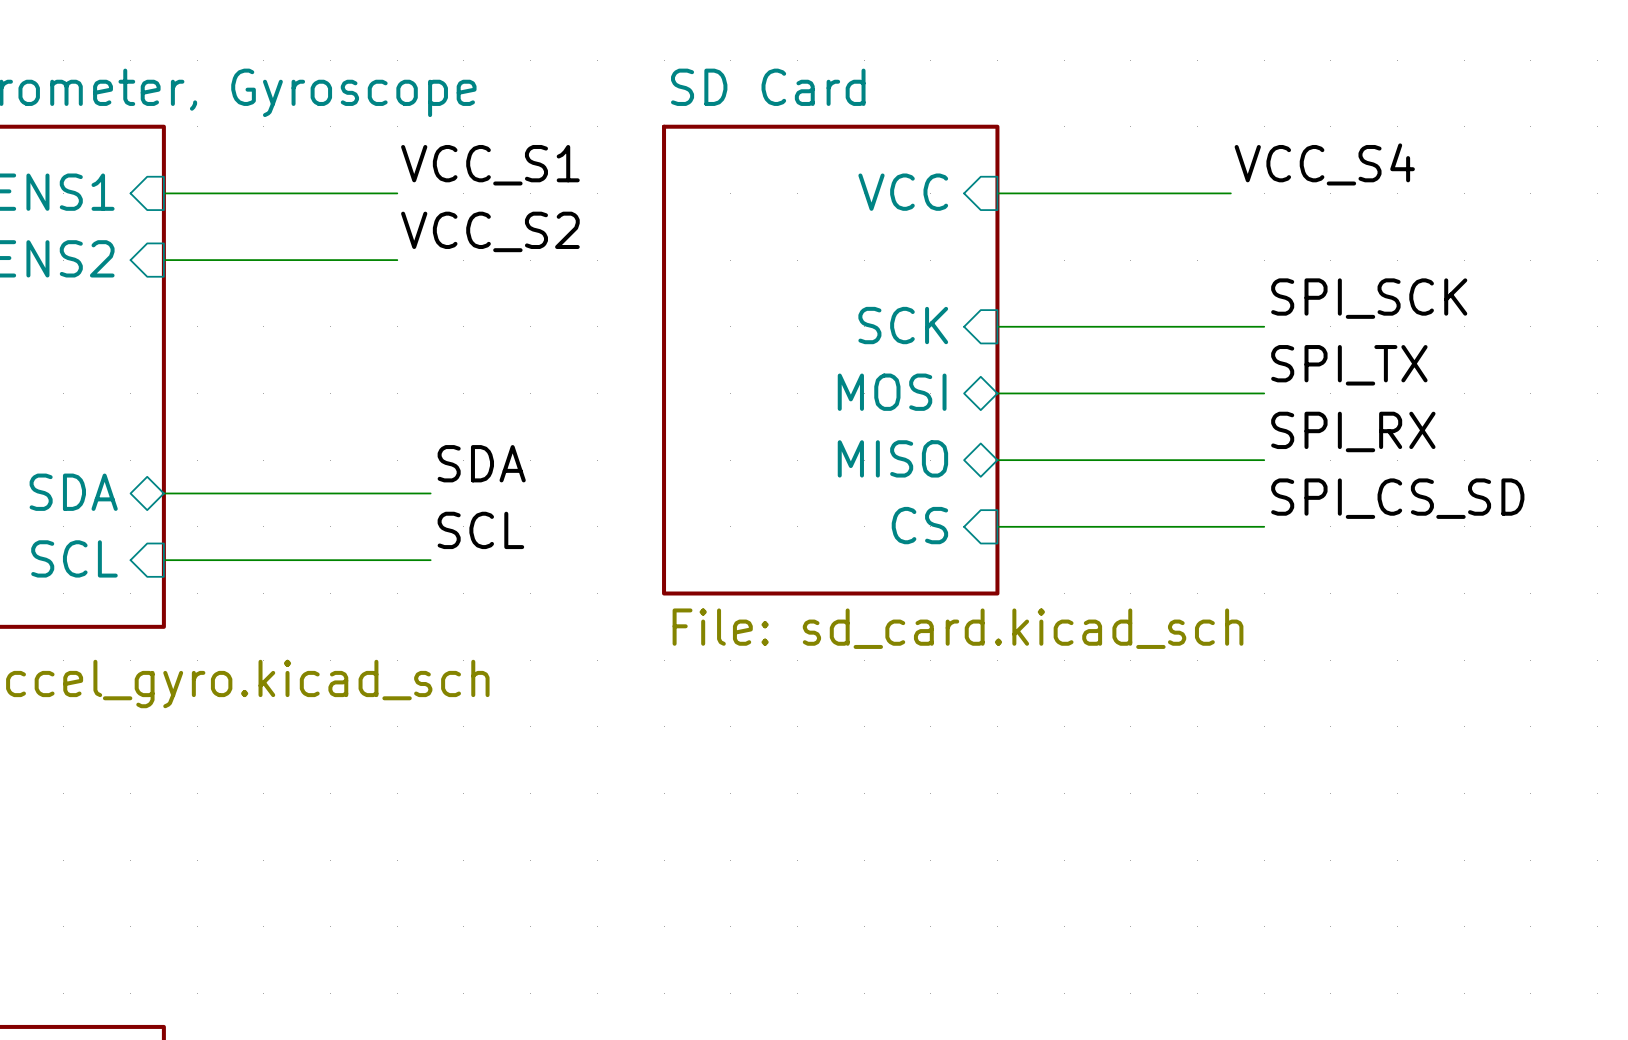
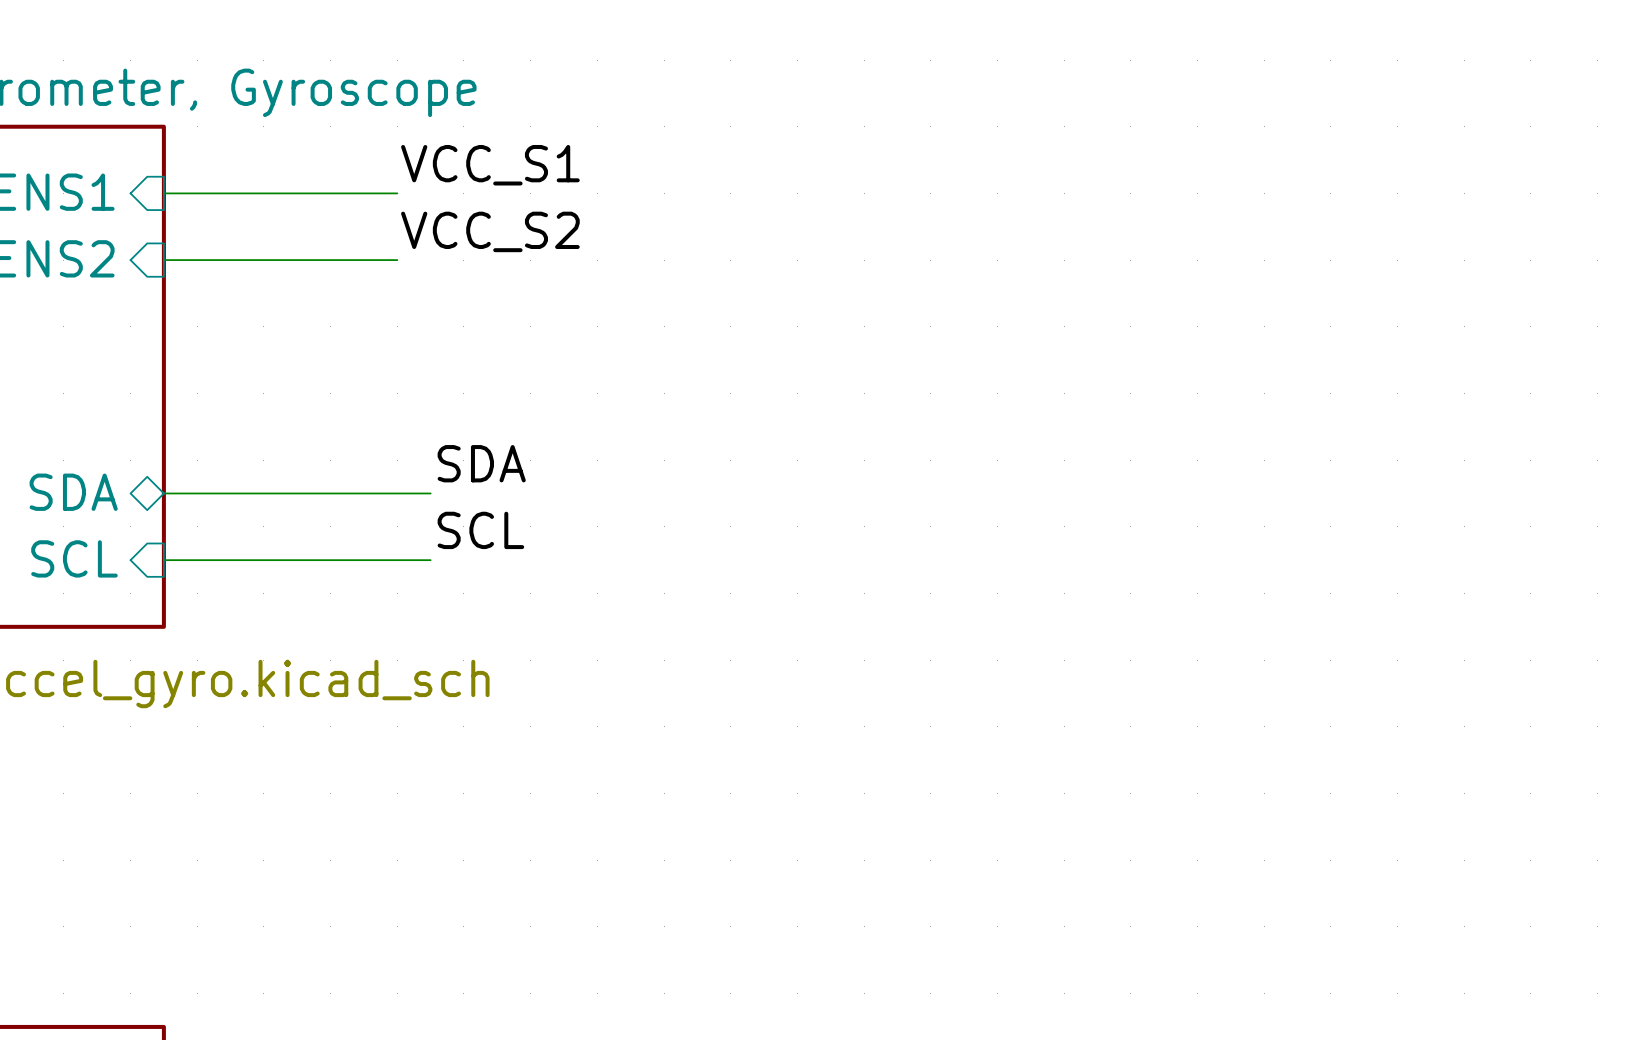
label: VCC_S4 (1324, 164) -> none
sheet pin: VCC (903, 192) -> none
wire: (997, 193) (1230, 193) -> none
label: SPI_SCK (1369, 298) -> none
sheet pin: SCK (903, 325) -> none
wire: (997, 326) (1264, 326) -> none
sheet SD Card: File: sd_card.kicad_sch (830, 360) -> none
label: SPI_TX (1349, 365) -> none
sheet pin: MOSI (892, 392) -> none
wire: (997, 393) (1264, 393) -> none
label: SPI_RX (1353, 431) -> none
sheet pin: MISO (892, 458) -> none
wire: (997, 460) (1264, 460) -> none
label: SPI_CS_SD (1397, 498) -> none
sheet pin: CS (919, 525) -> none
wire: (997, 526) (1264, 526) -> none

